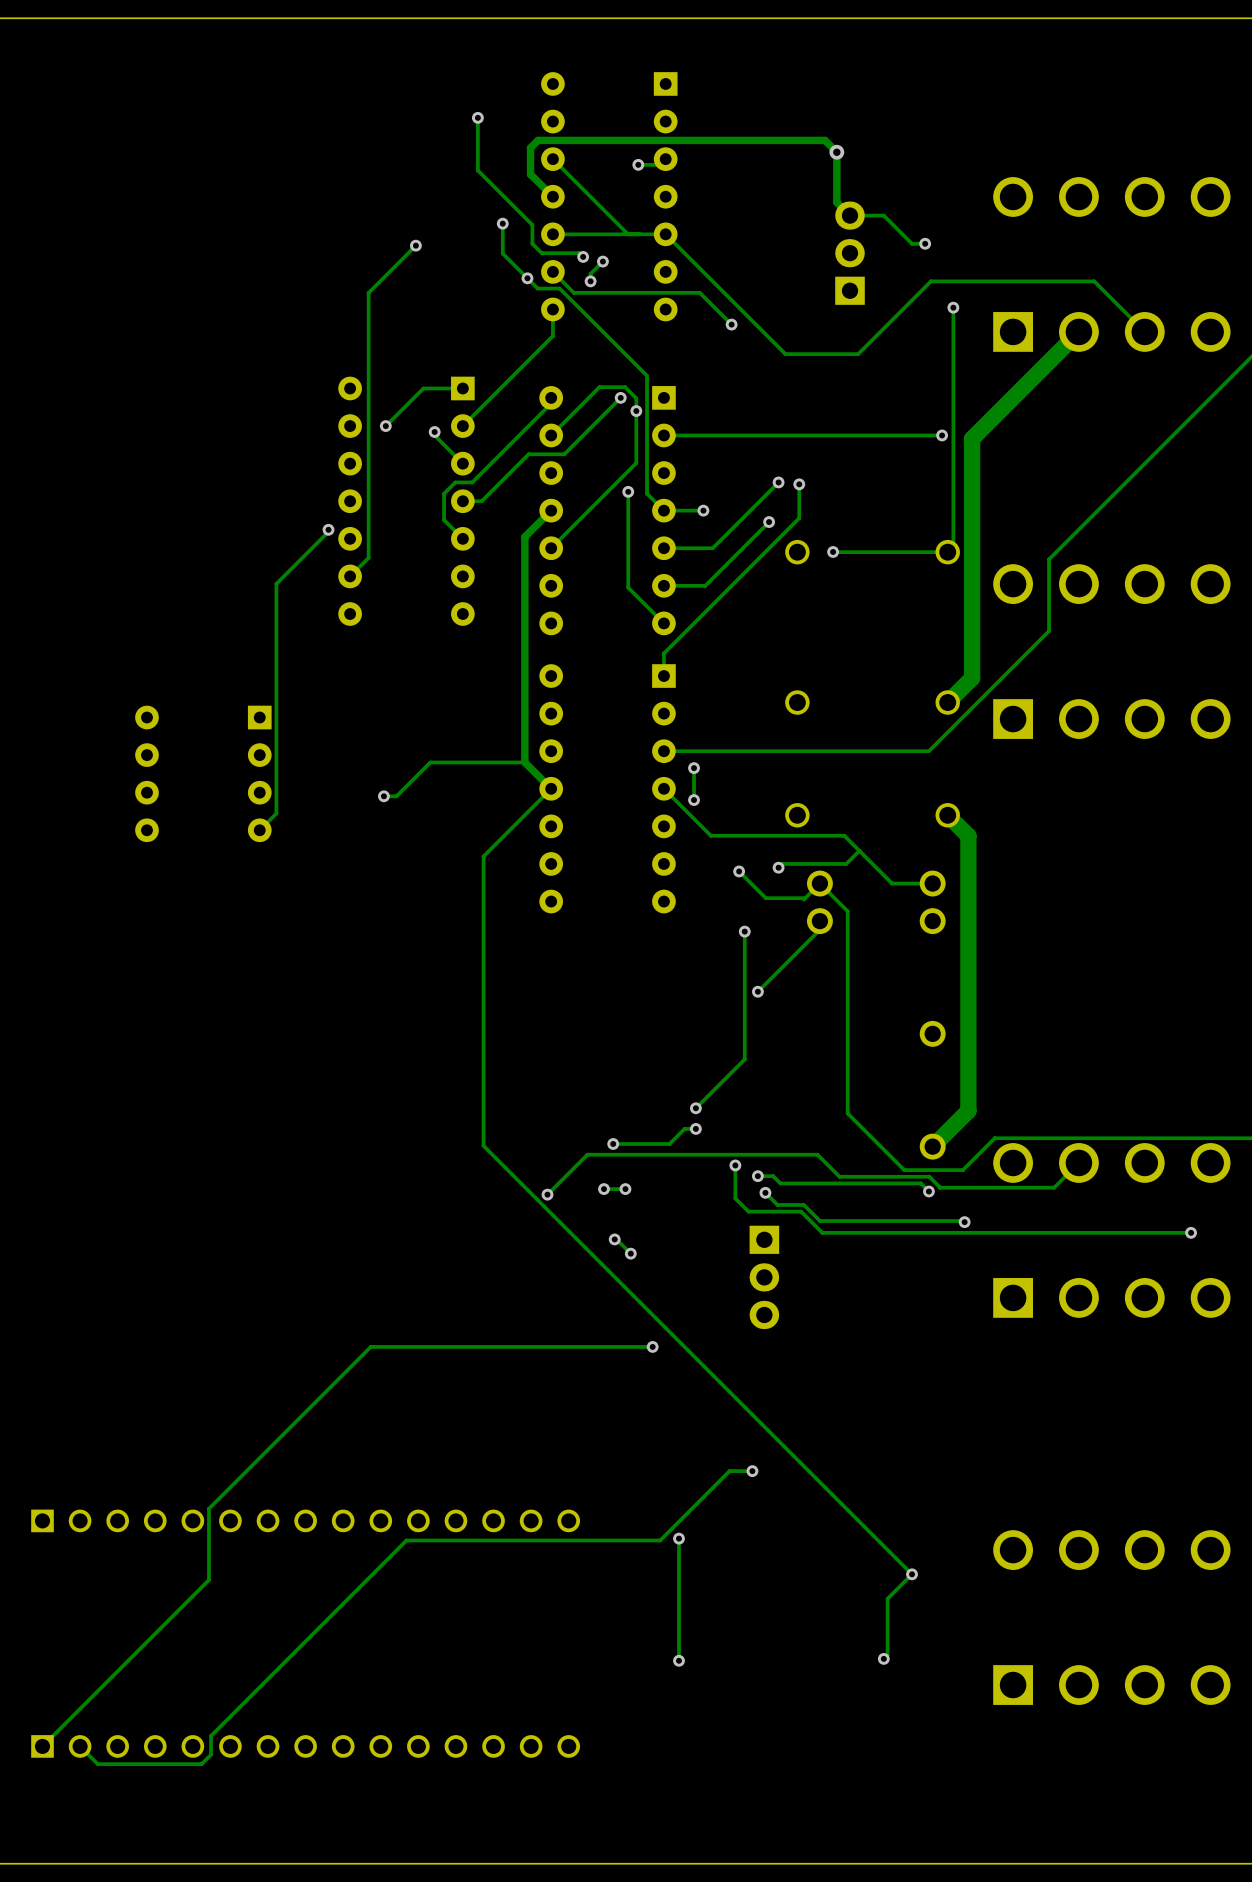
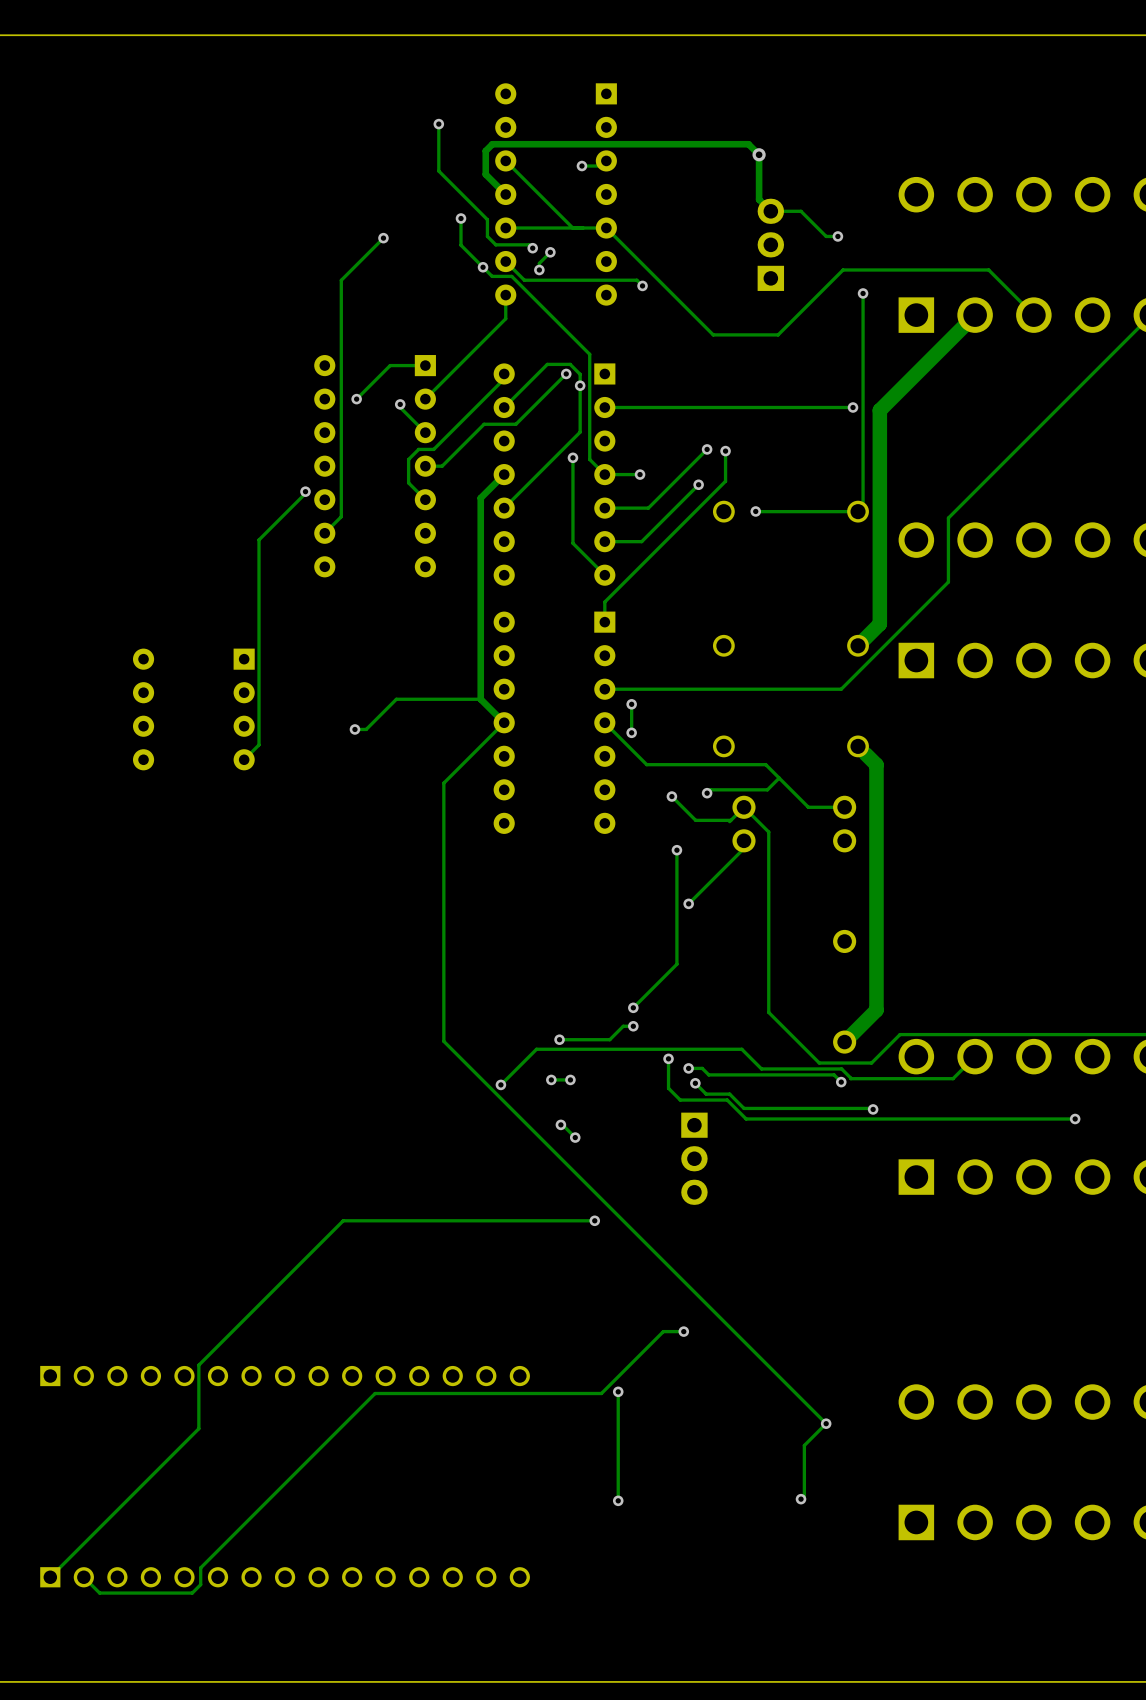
track: (706, 299) (731, 324) -> none
via position: (731, 324) -> (642, 285)

